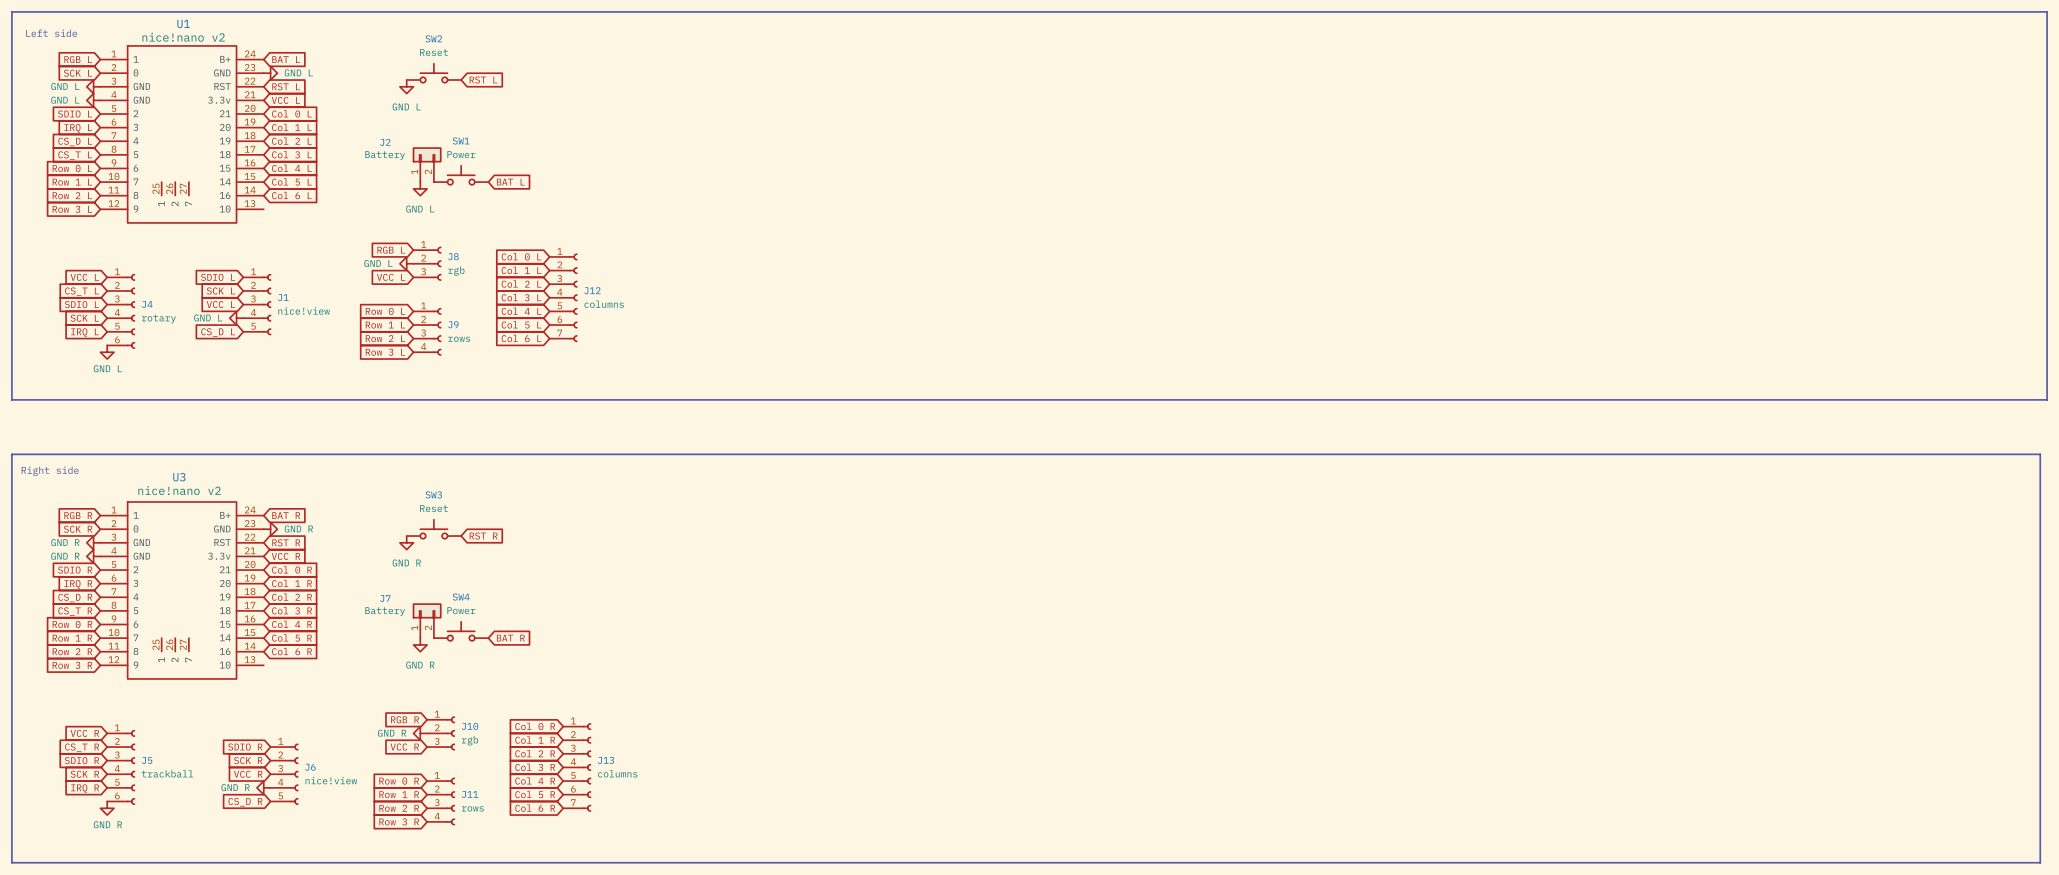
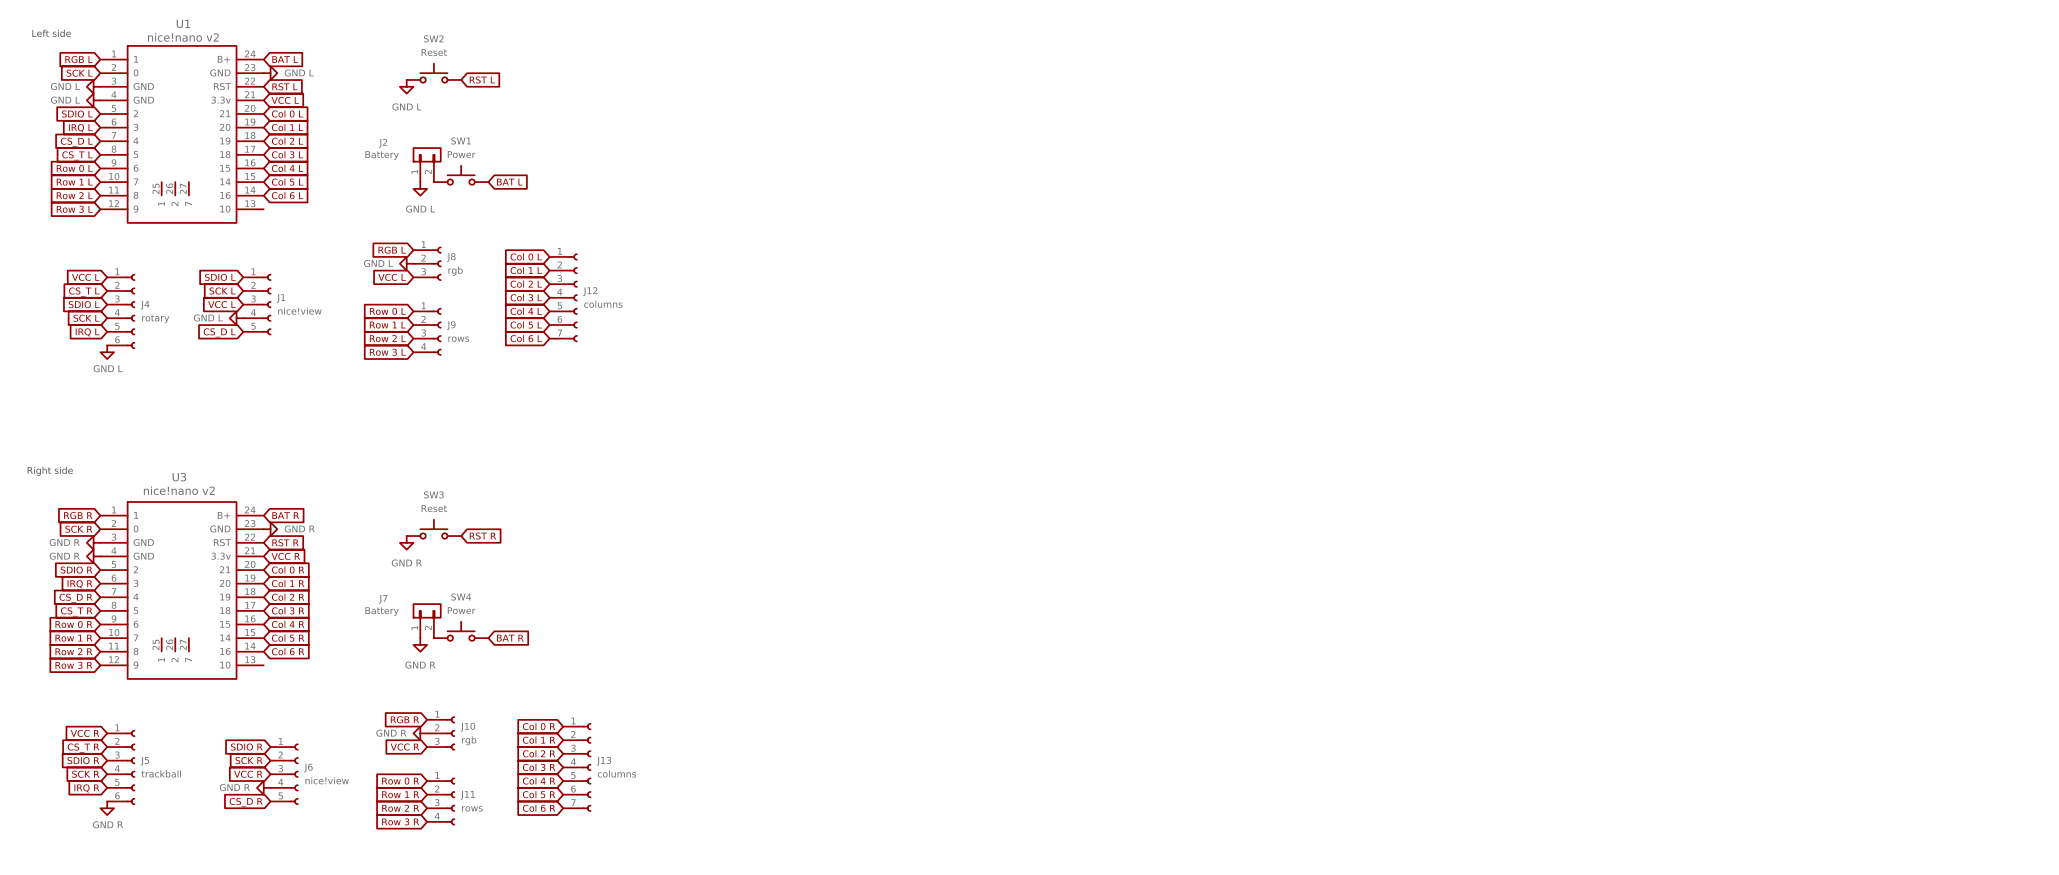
line: (11, 11) (2047, 11) (2047, 399) (11, 399) (11, 11) -> none
line: (11, 454) (11, 862) (2040, 862) (2040, 454) (11, 454) -> none

